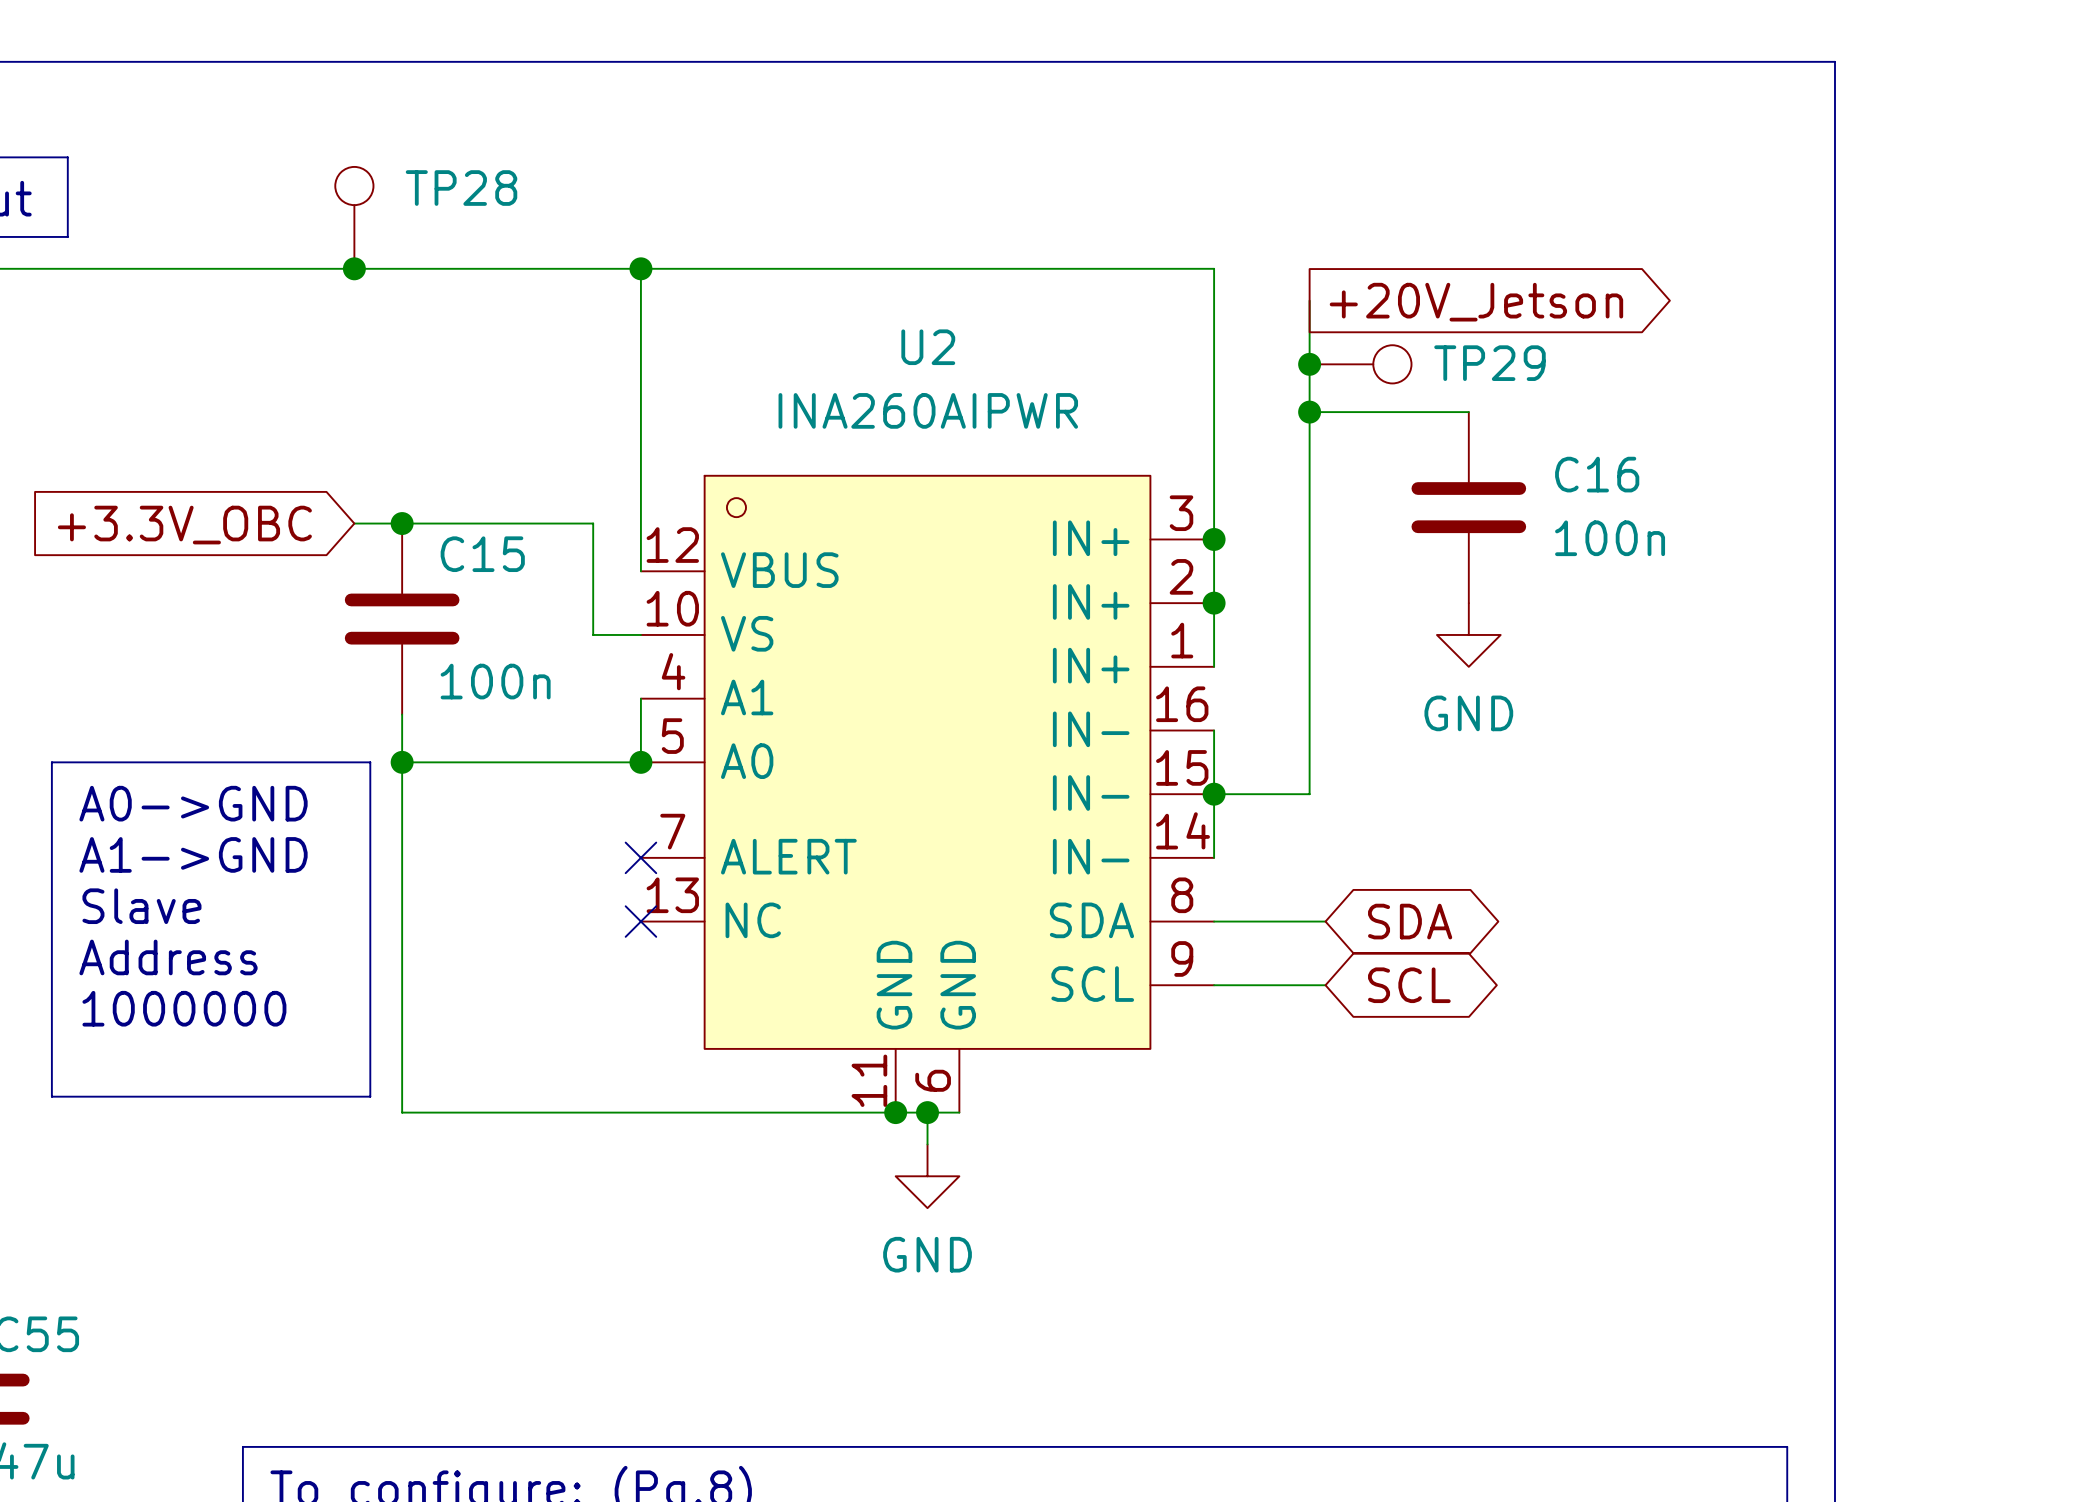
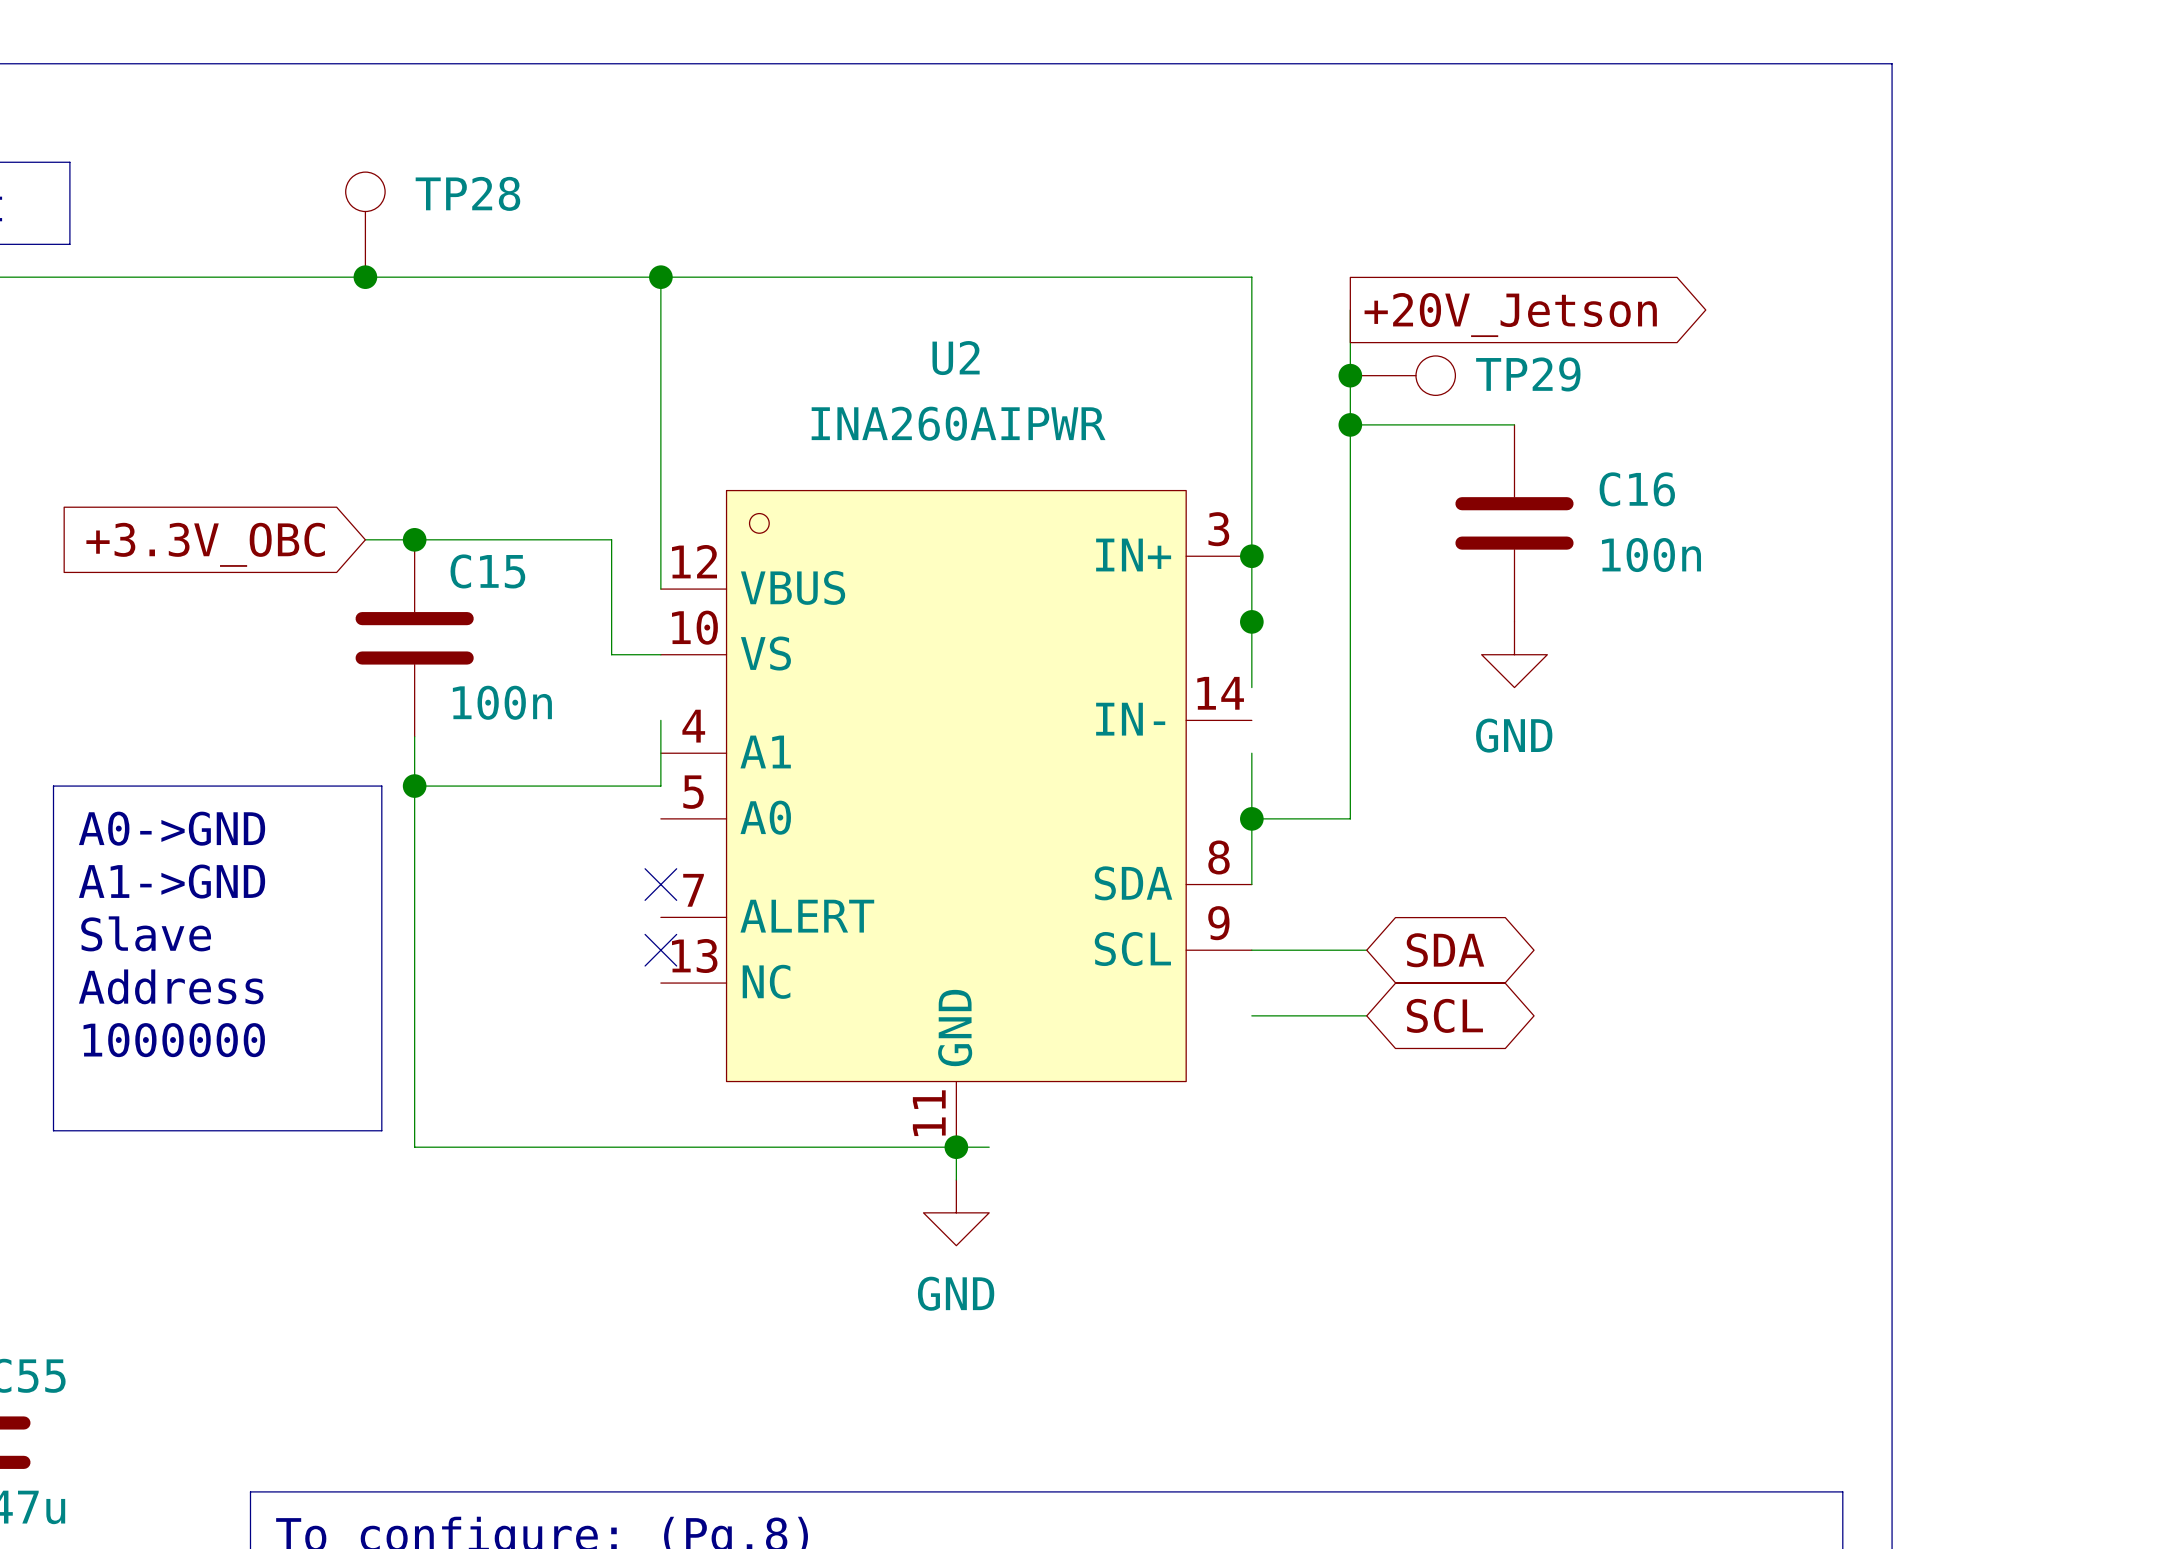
U2 symbol: [640, 475, 1215, 1113] -> [660, 490, 1252, 1148]
junction: (640, 762) -> none
junction: (895, 1112) -> none

